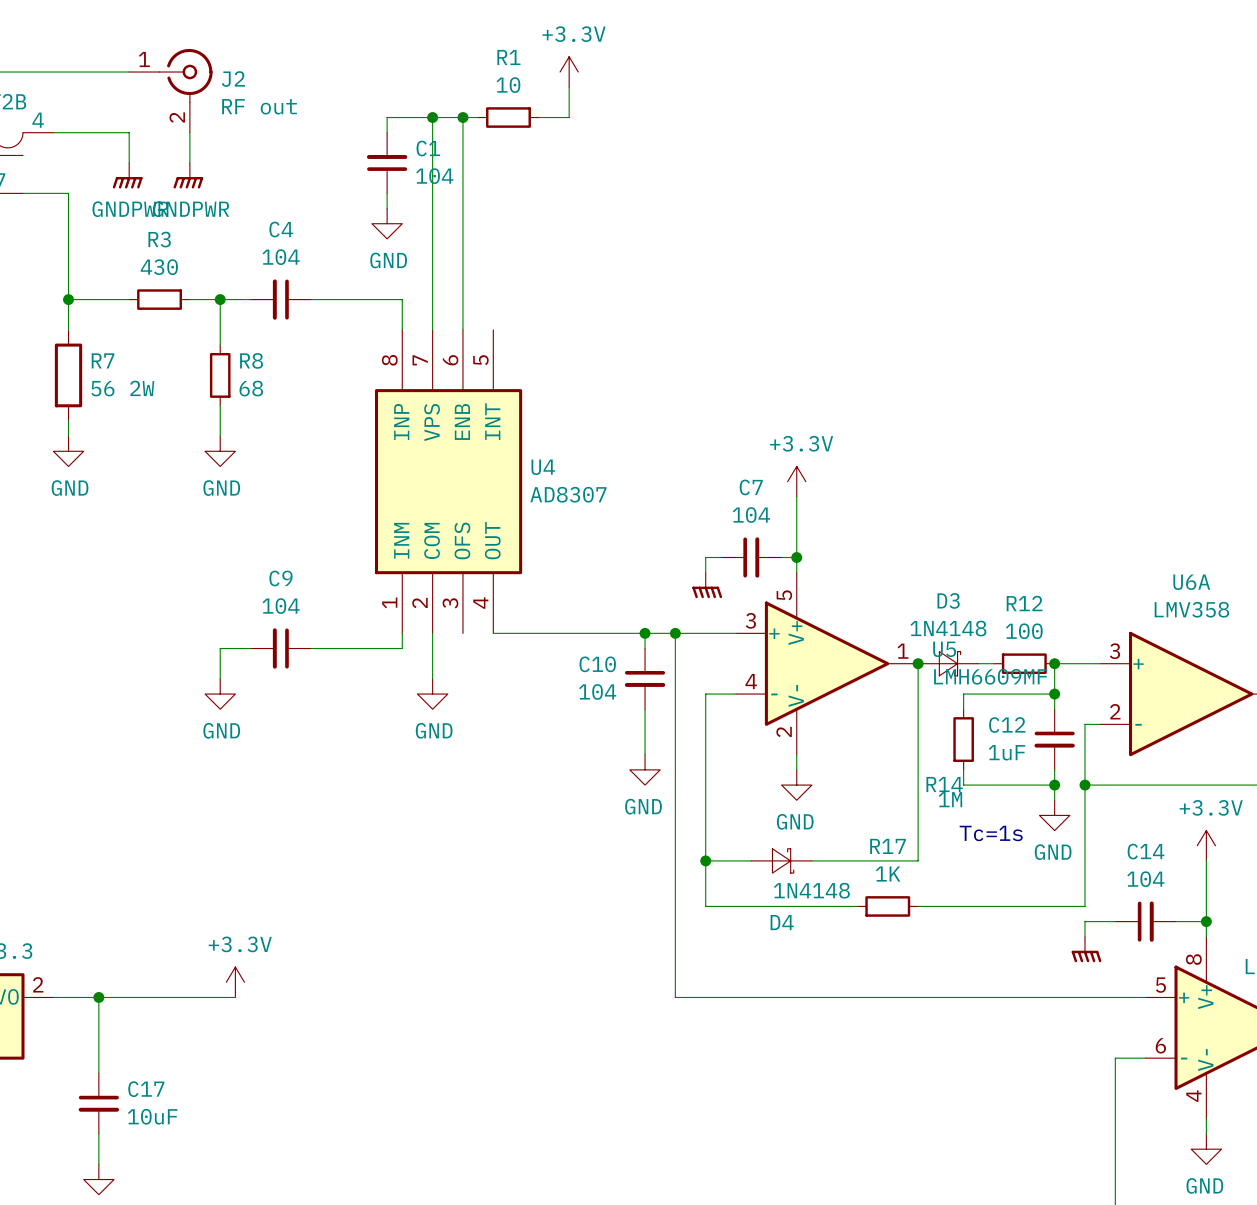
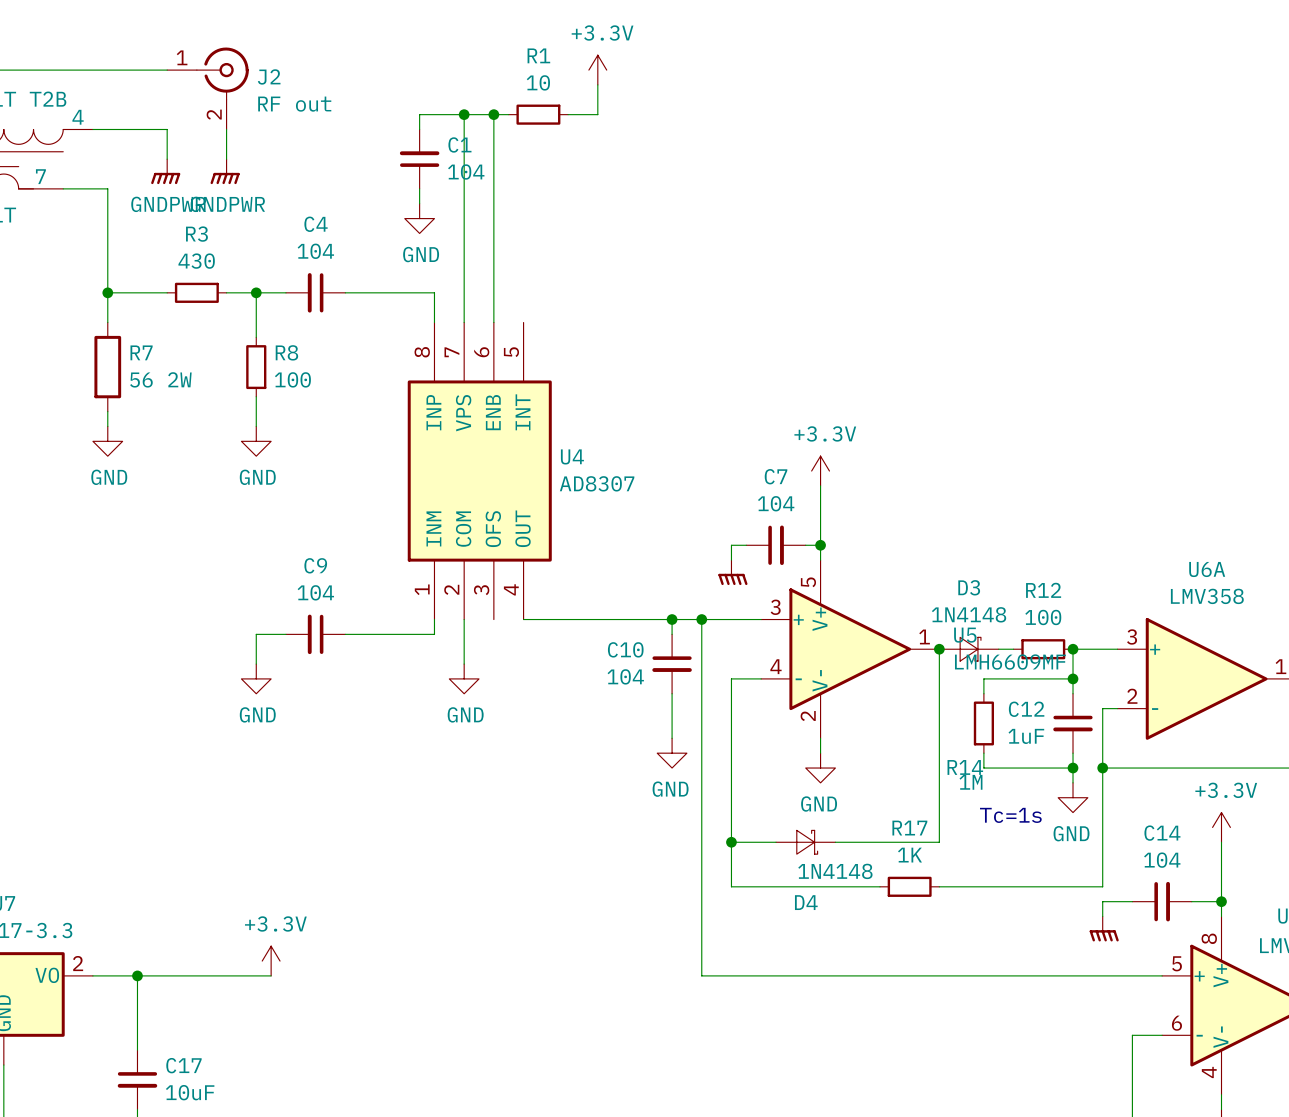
R8 value: 68 (251, 388) -> 100 (292, 379)

